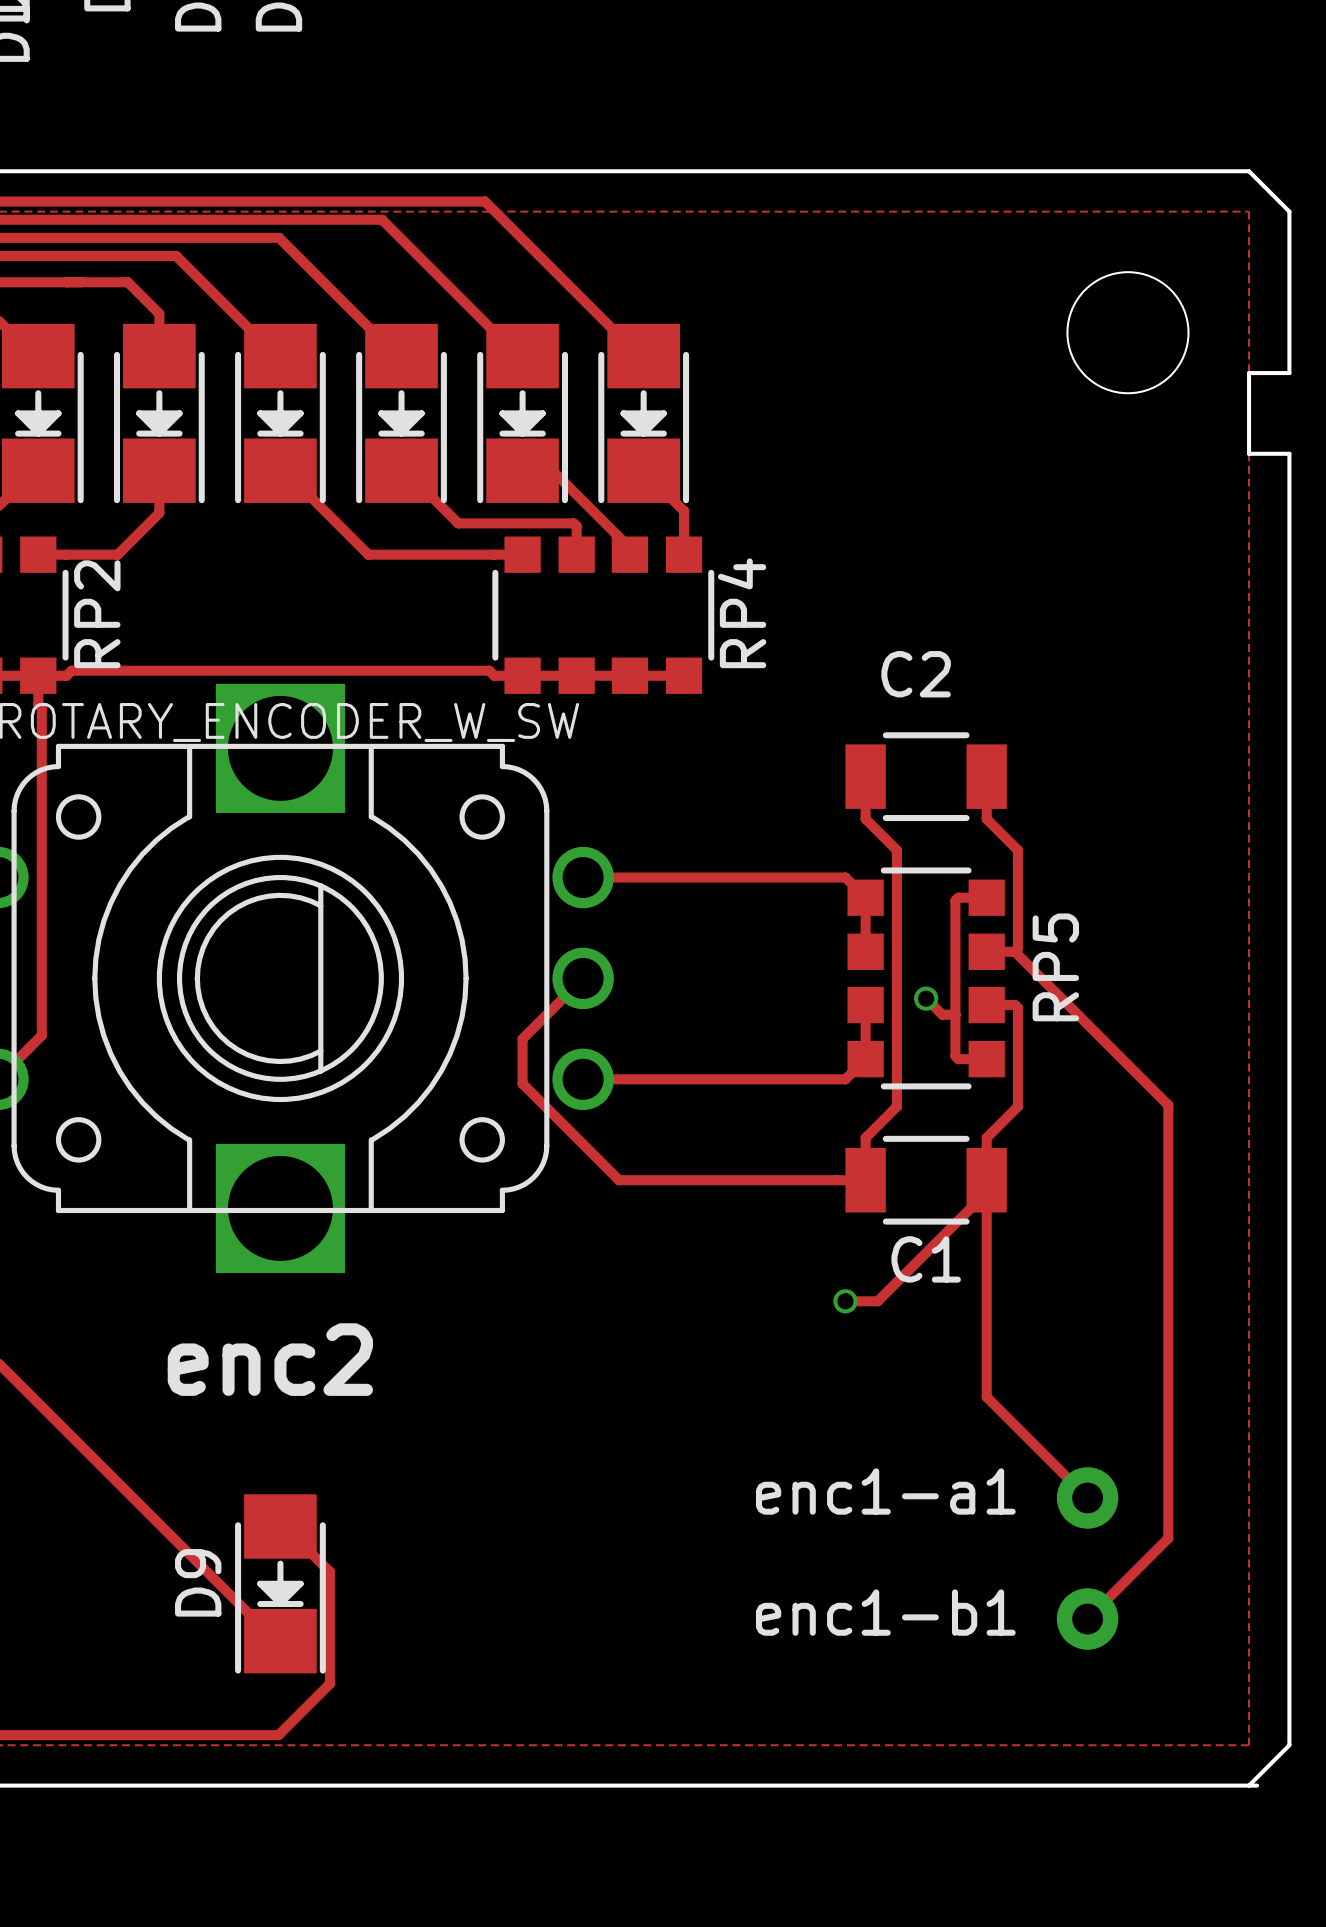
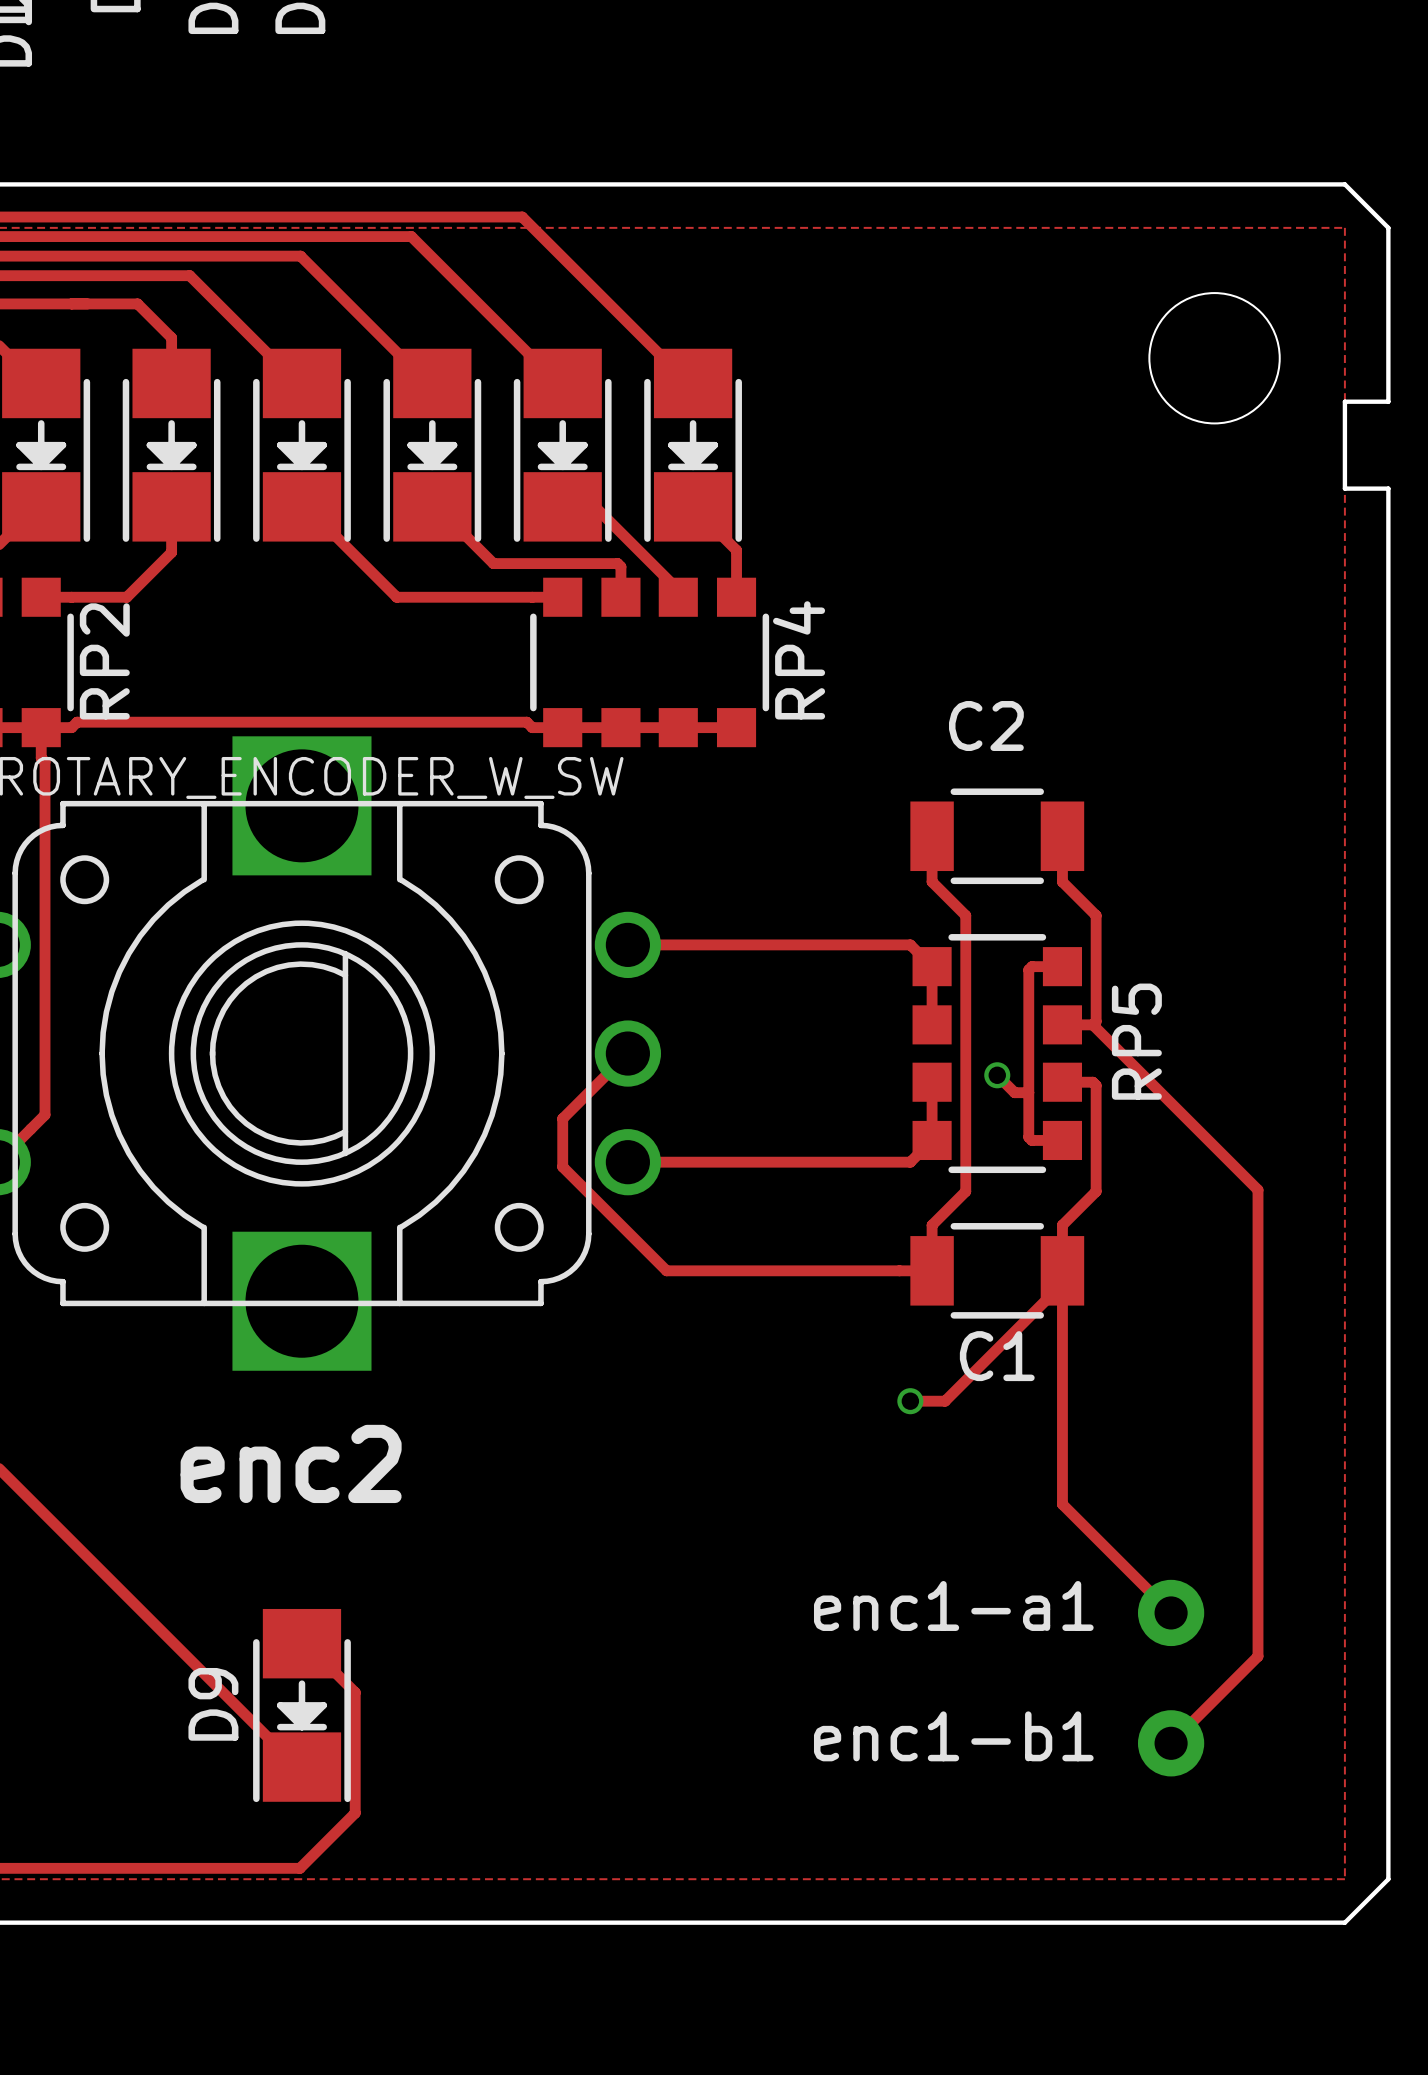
board edge: (1249, 1785) (1257, 1785) -> none

